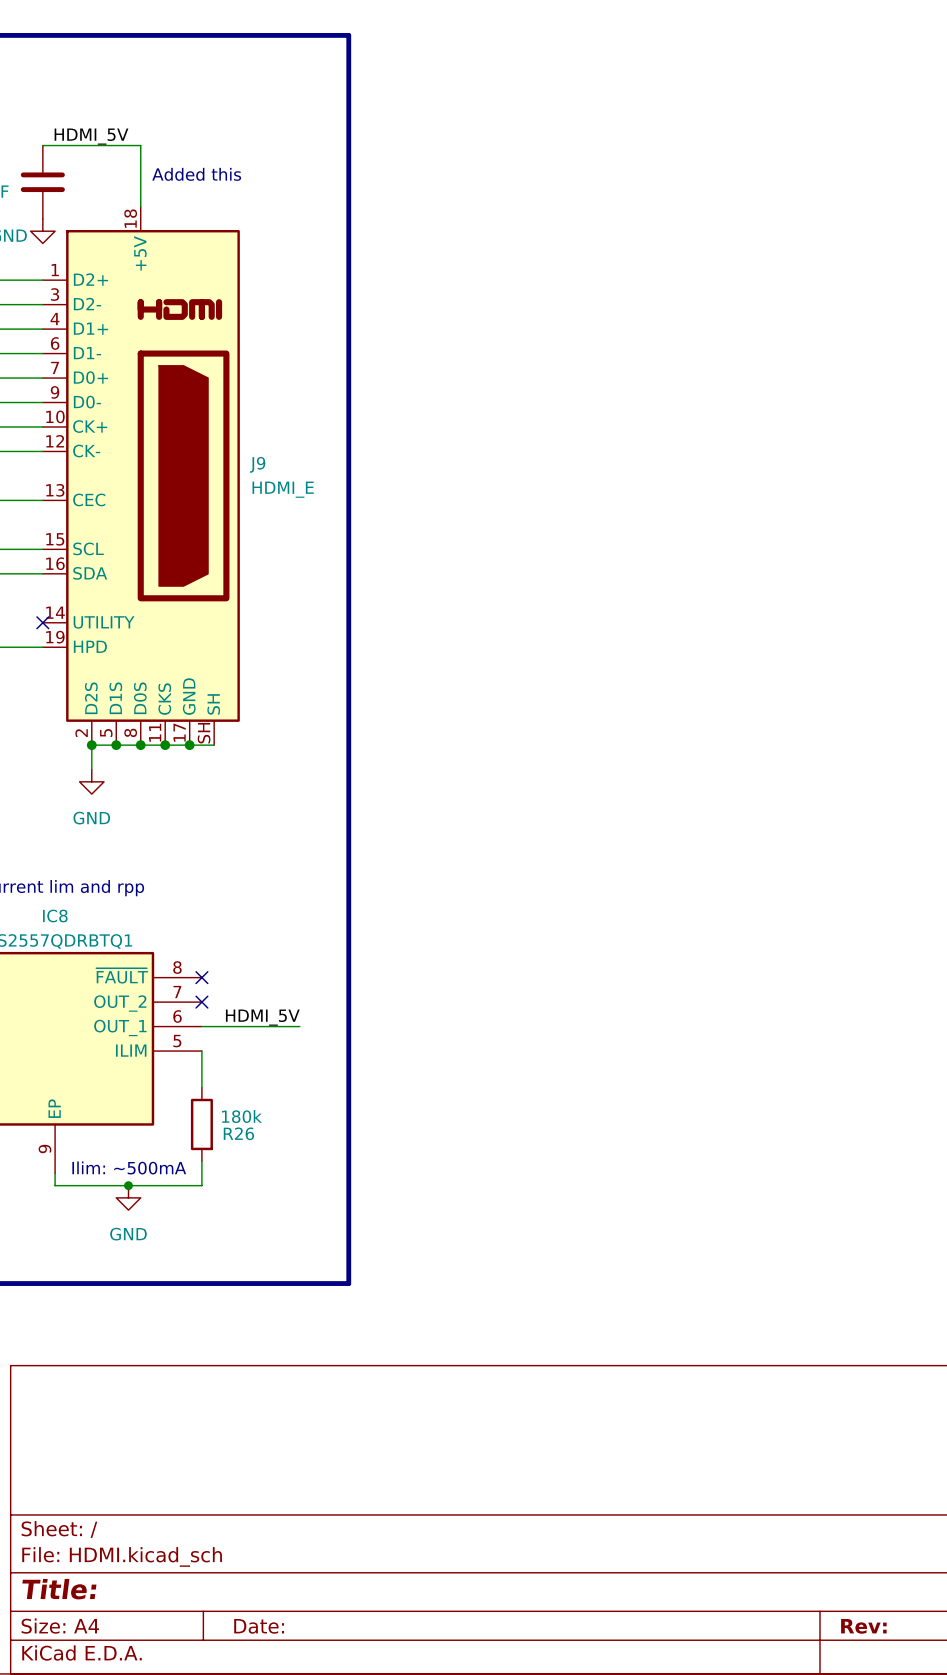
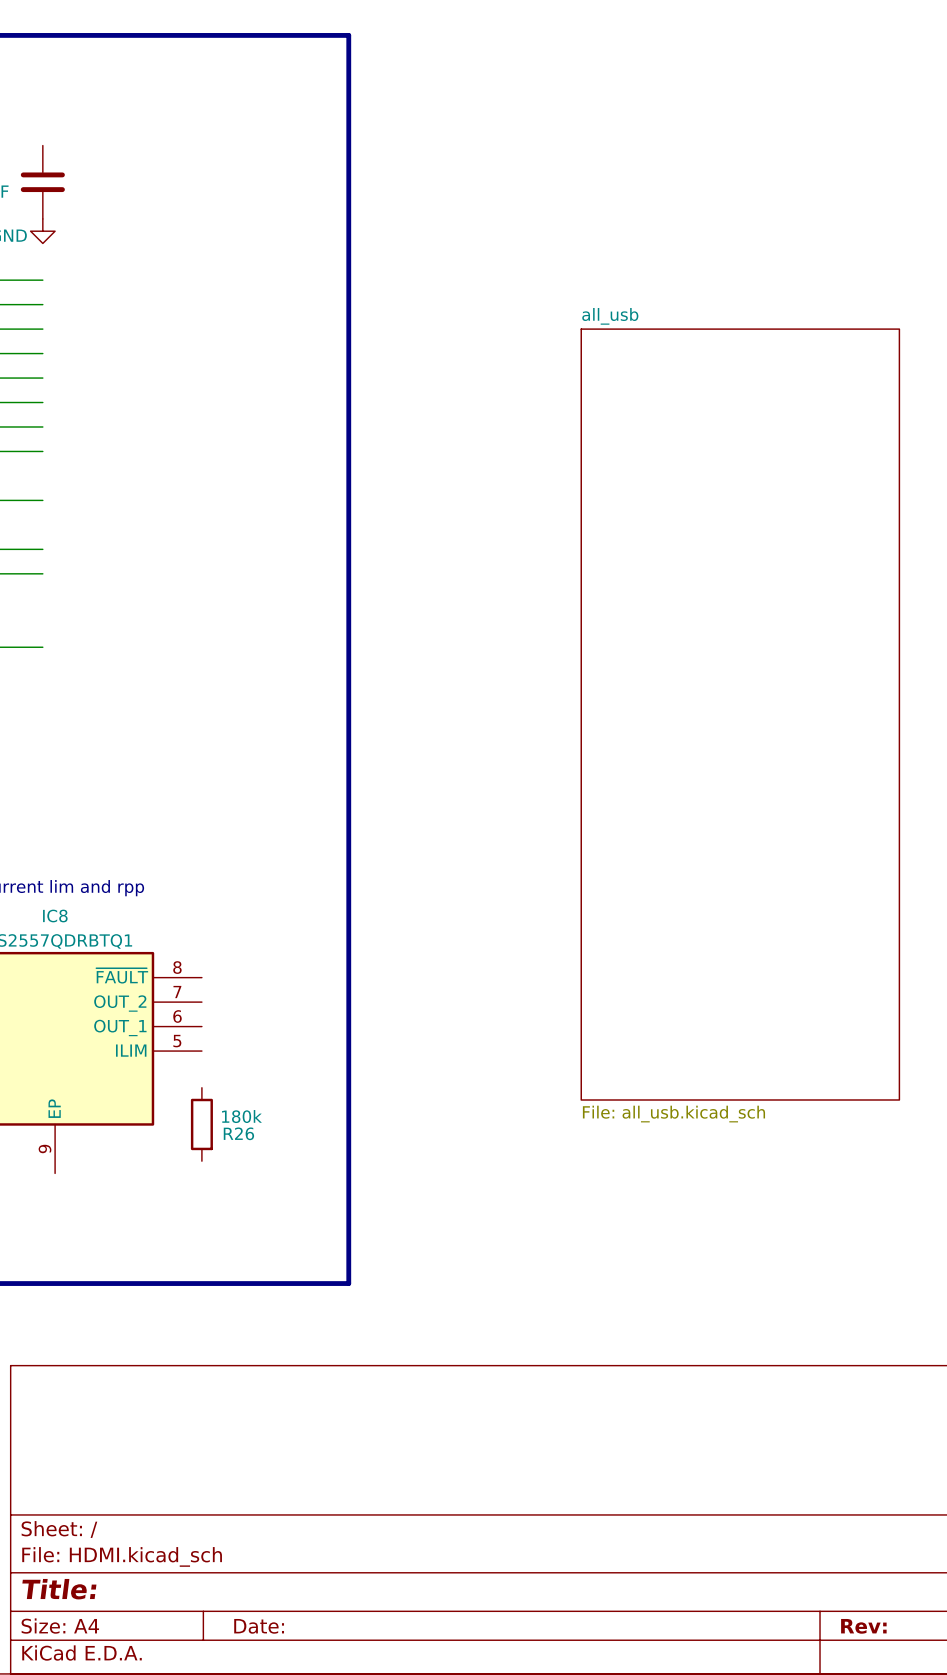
label: HDMI_5V (91, 136) -> none
wire: (42, 145) (140, 145) (140, 206) -> none
text: Added this (196, 174) -> none
J9: HDMI_E (141, 475) -> none
no-connect mark: (42, 622) -> none
sheet all_usb: none -> File: all_usb.kicad_sch (740, 714)
junction: (91, 745) -> none
junction: (116, 745) -> none
junction: (140, 745) -> none
junction: (165, 745) -> none
junction: (189, 745) -> none
wire: (214, 745) (91, 745) (91, 769) -> none
power symbol: GND (91, 781) -> none
no-connect mark: (201, 977) -> none
no-connect mark: (201, 1002) -> none
label: HDMI_5V (262, 1017) -> none
wire: (201, 1026) (299, 1026) -> none
wire: (201, 1051) (201, 1087) -> none
wire: (201, 1161) (201, 1185) (55, 1185) (55, 1173) -> none
text: Ilim: ~500mA (129, 1167) -> none
junction: (128, 1185) -> none
power symbol: GND (128, 1197) -> none

